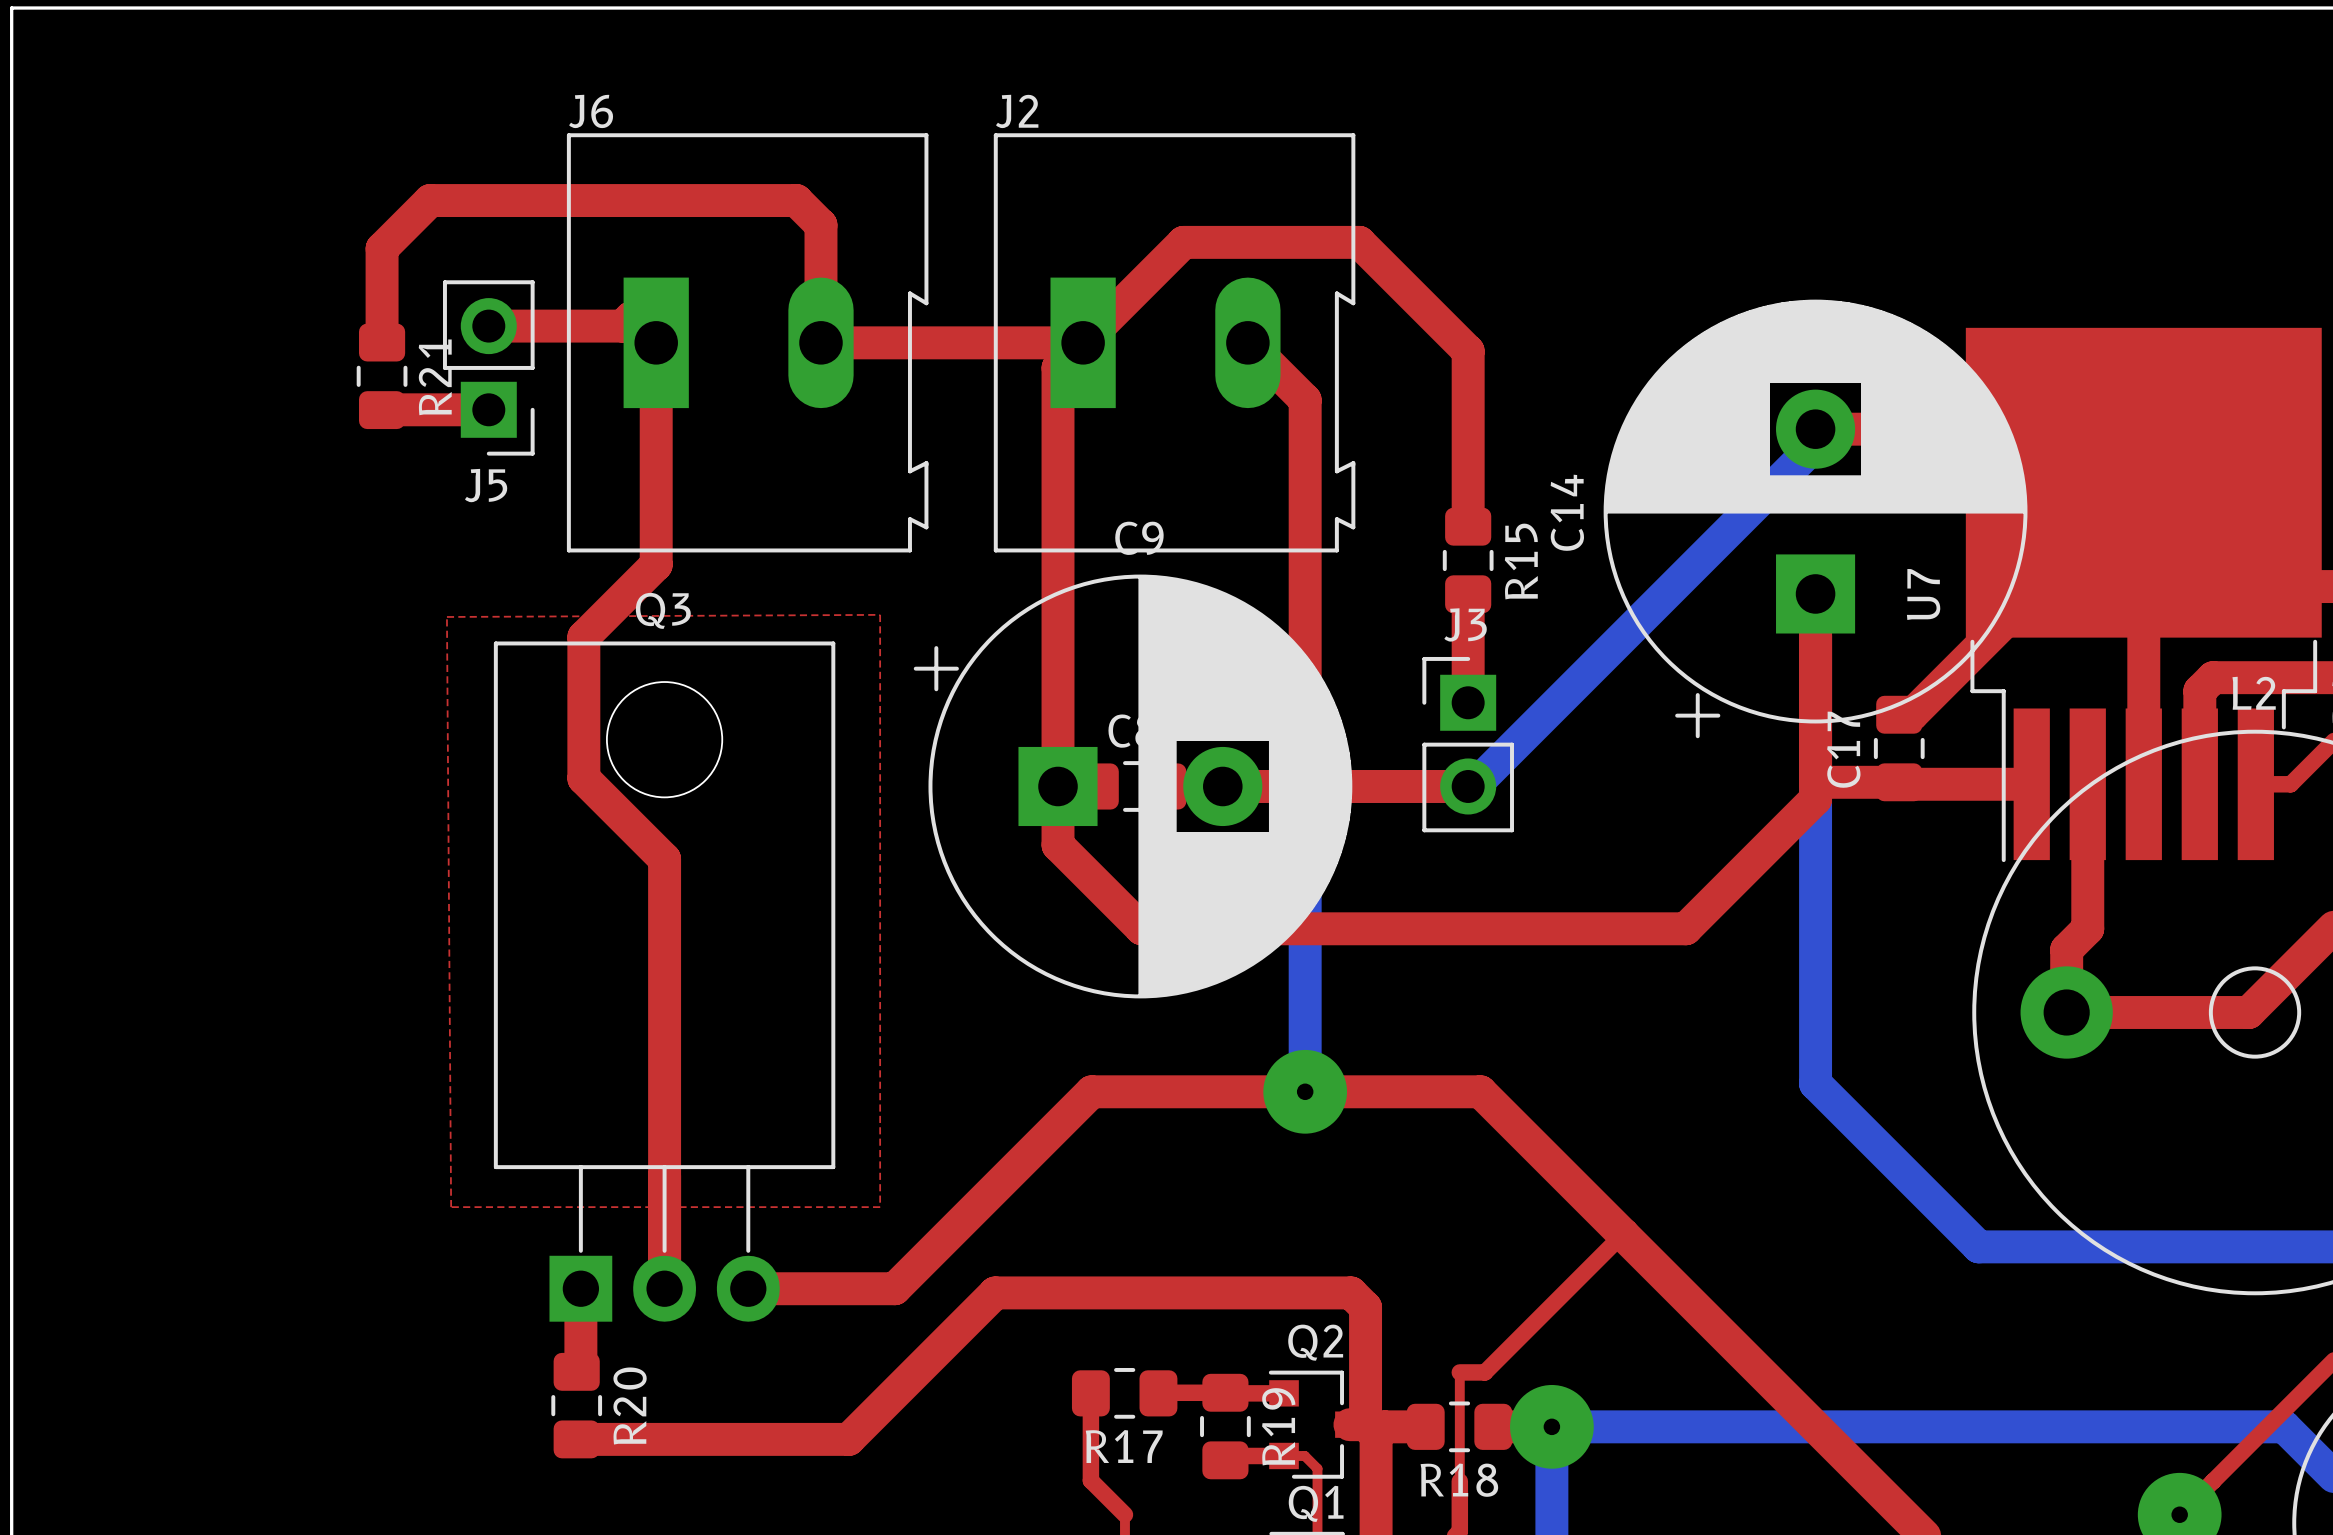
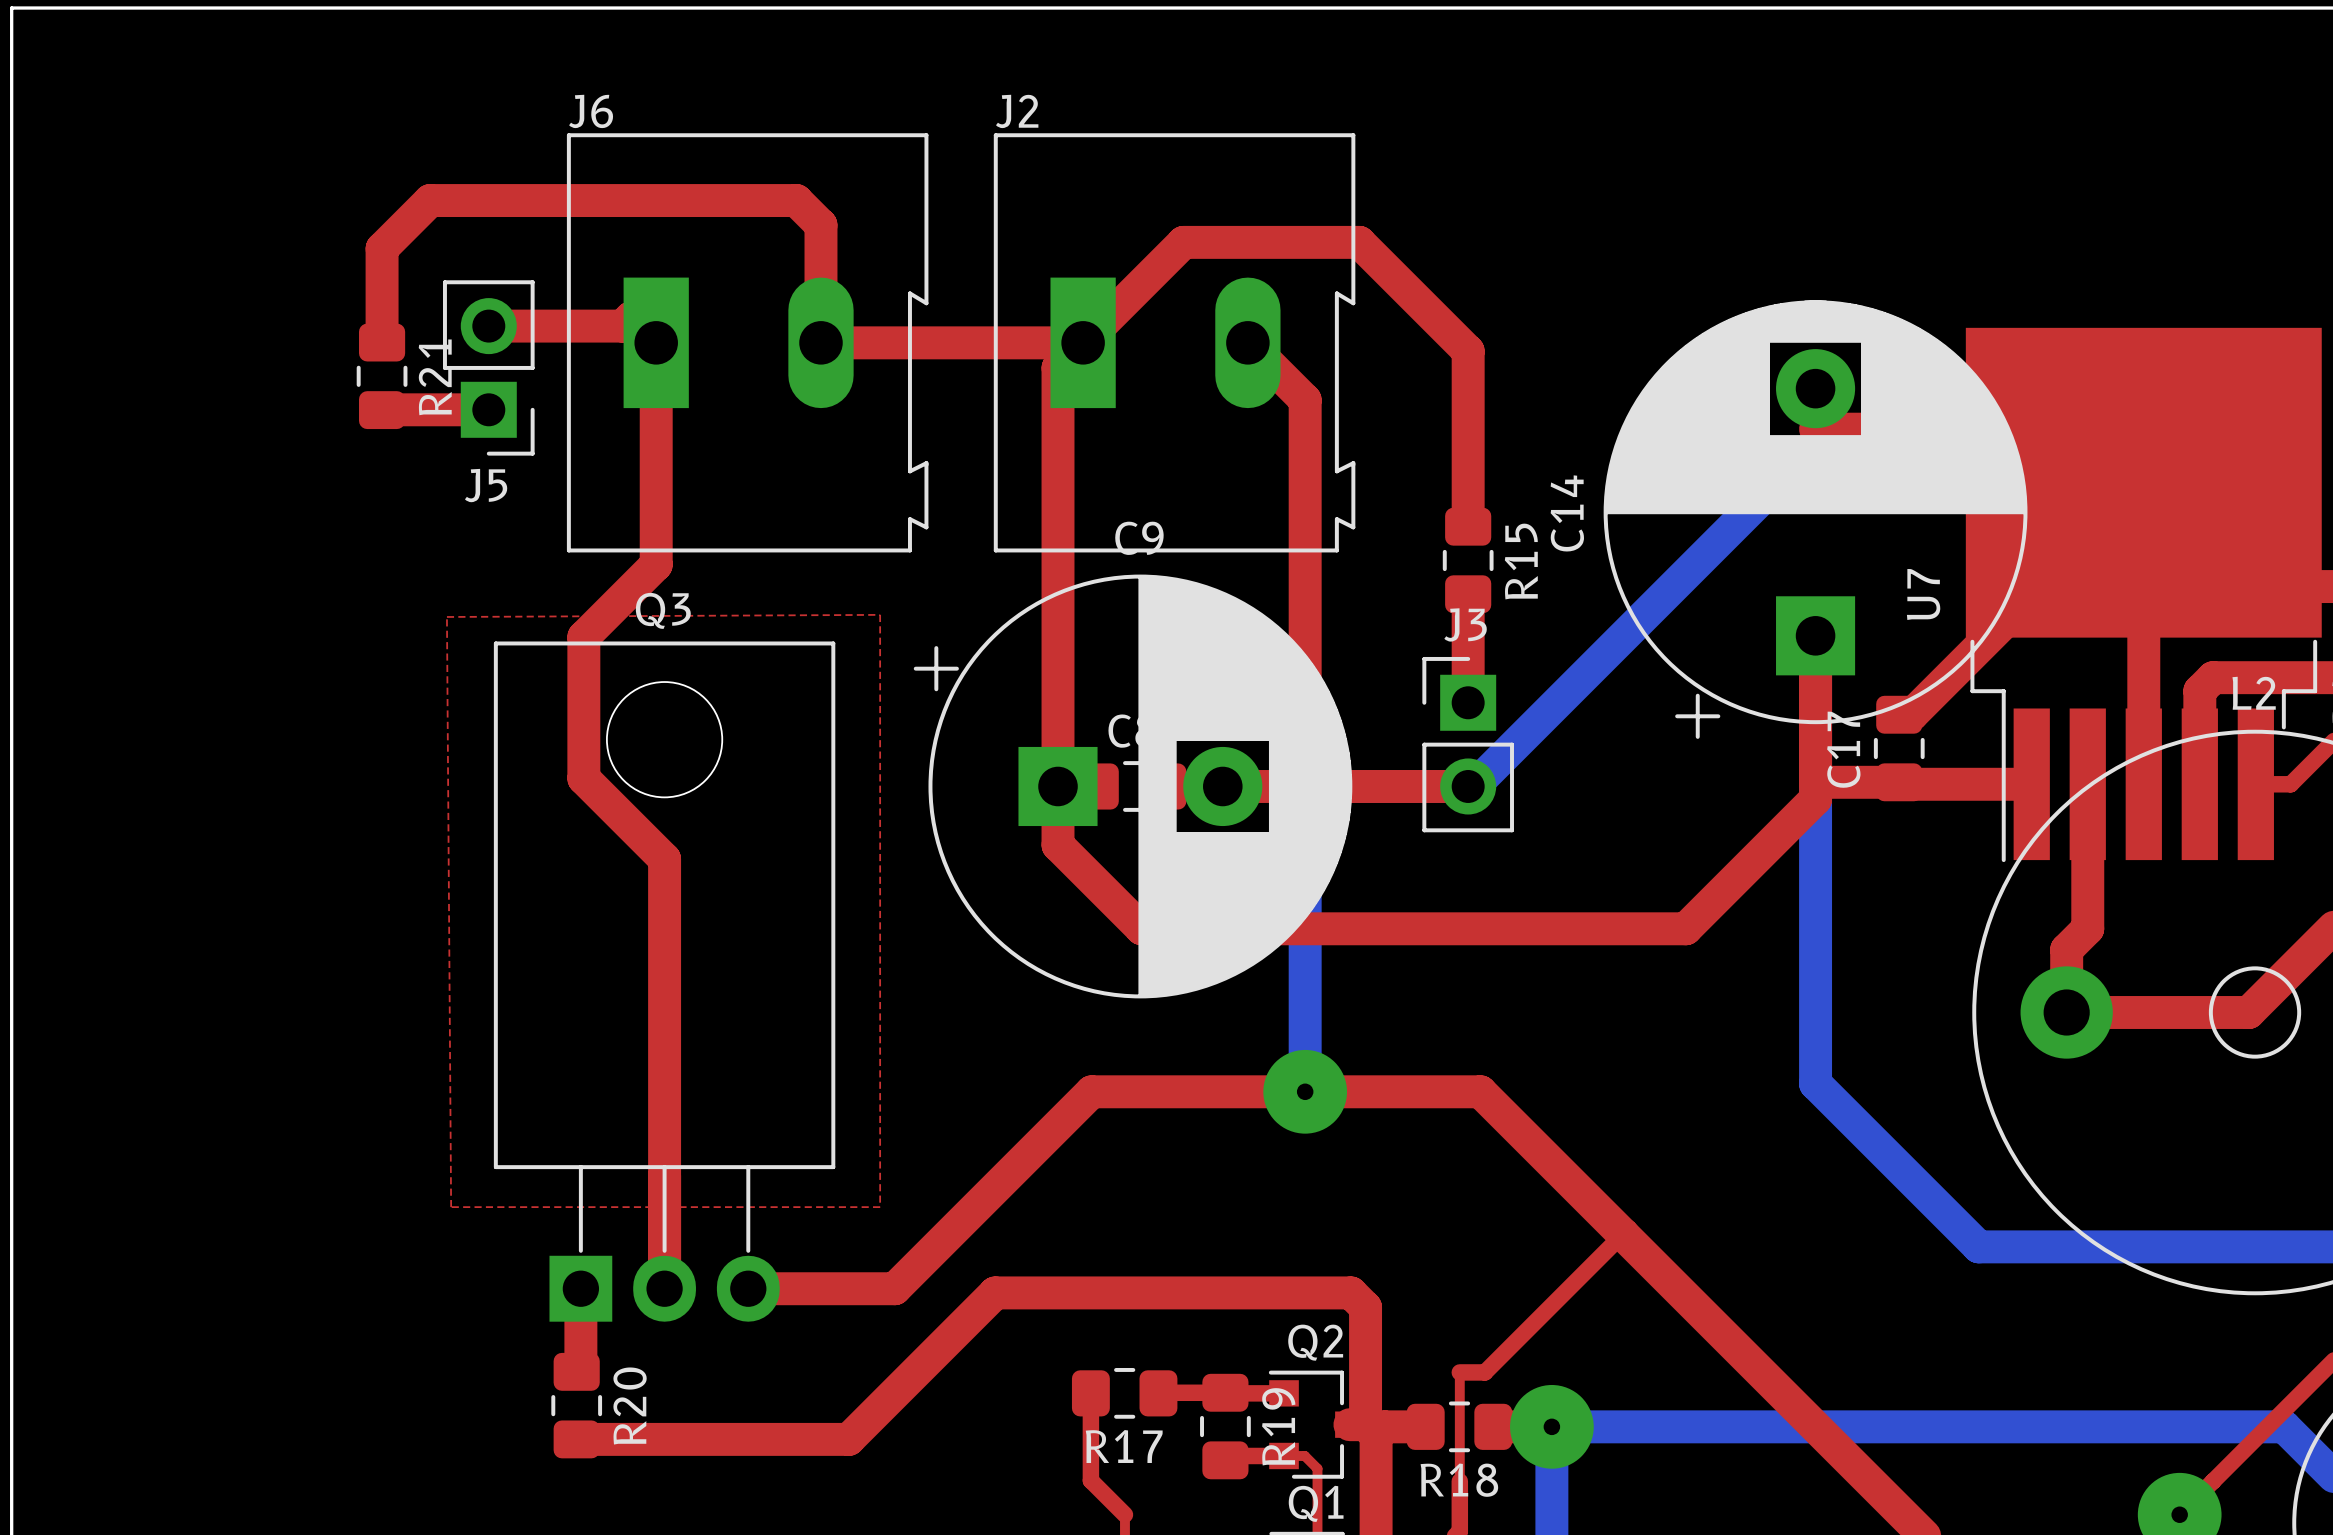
C14 footprint: [1603, 299, 2028, 739] -> [1603, 300, 2028, 739]

